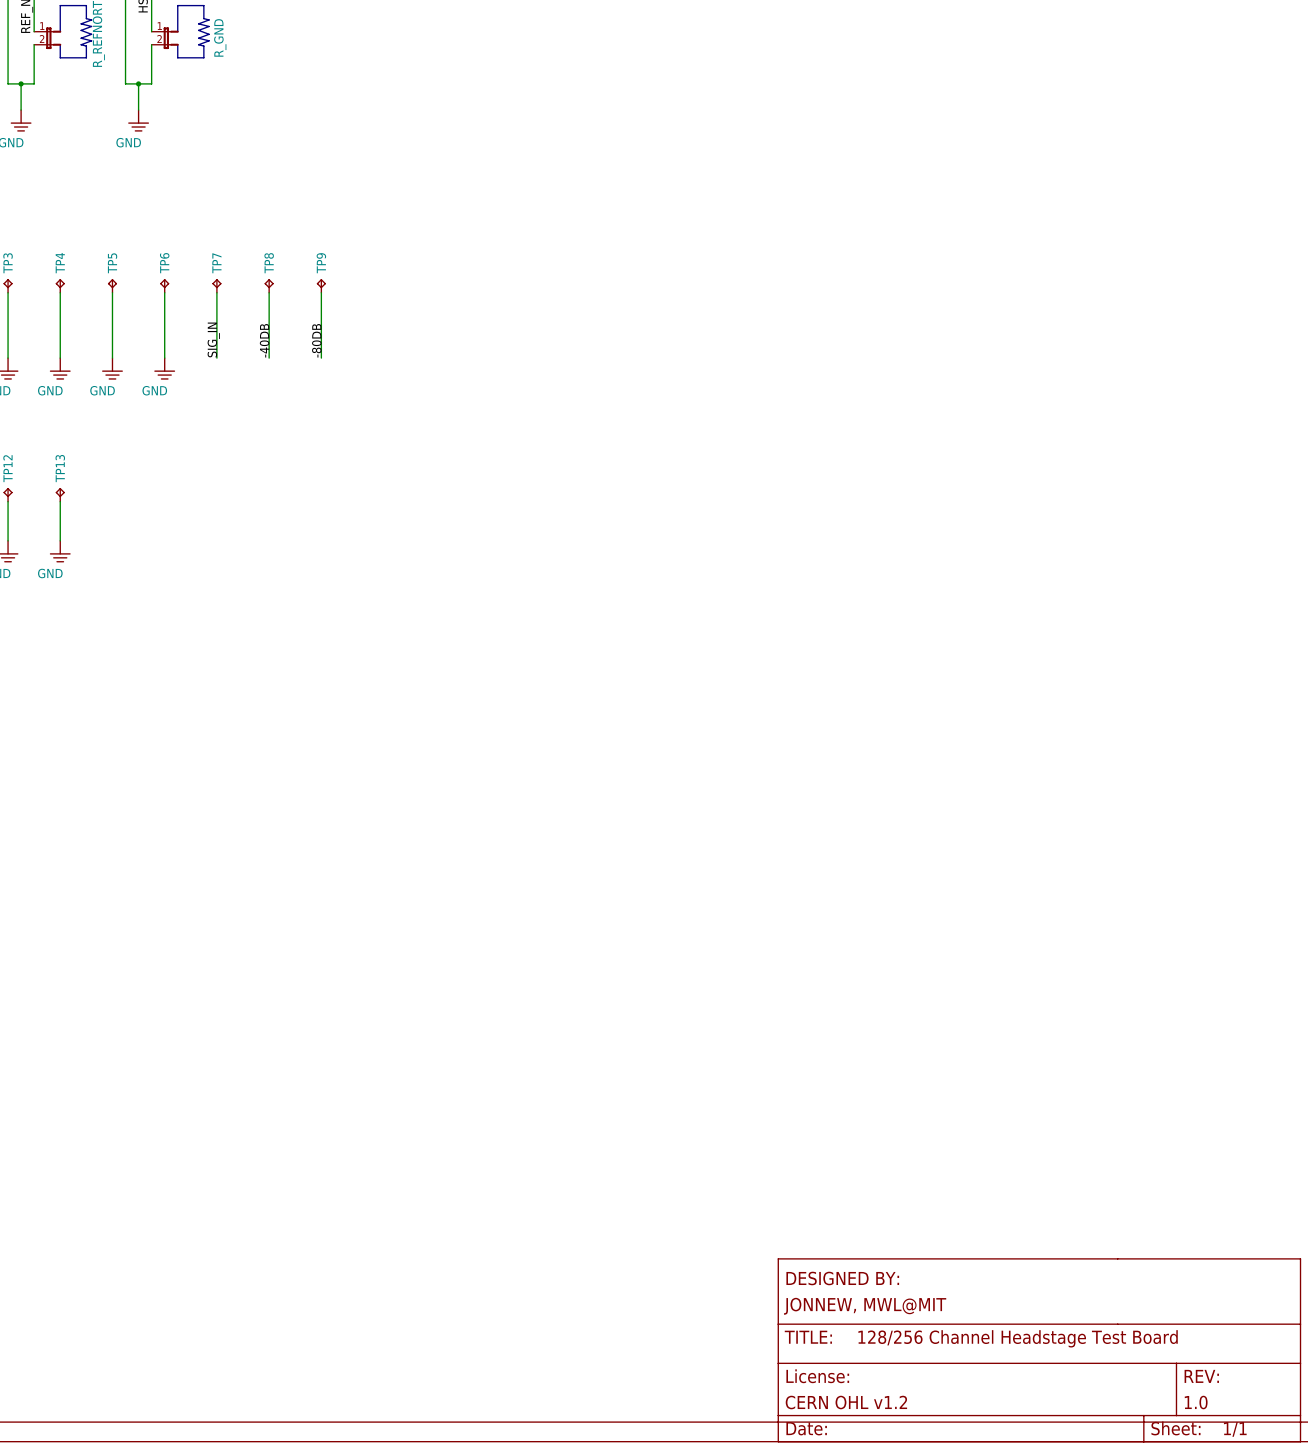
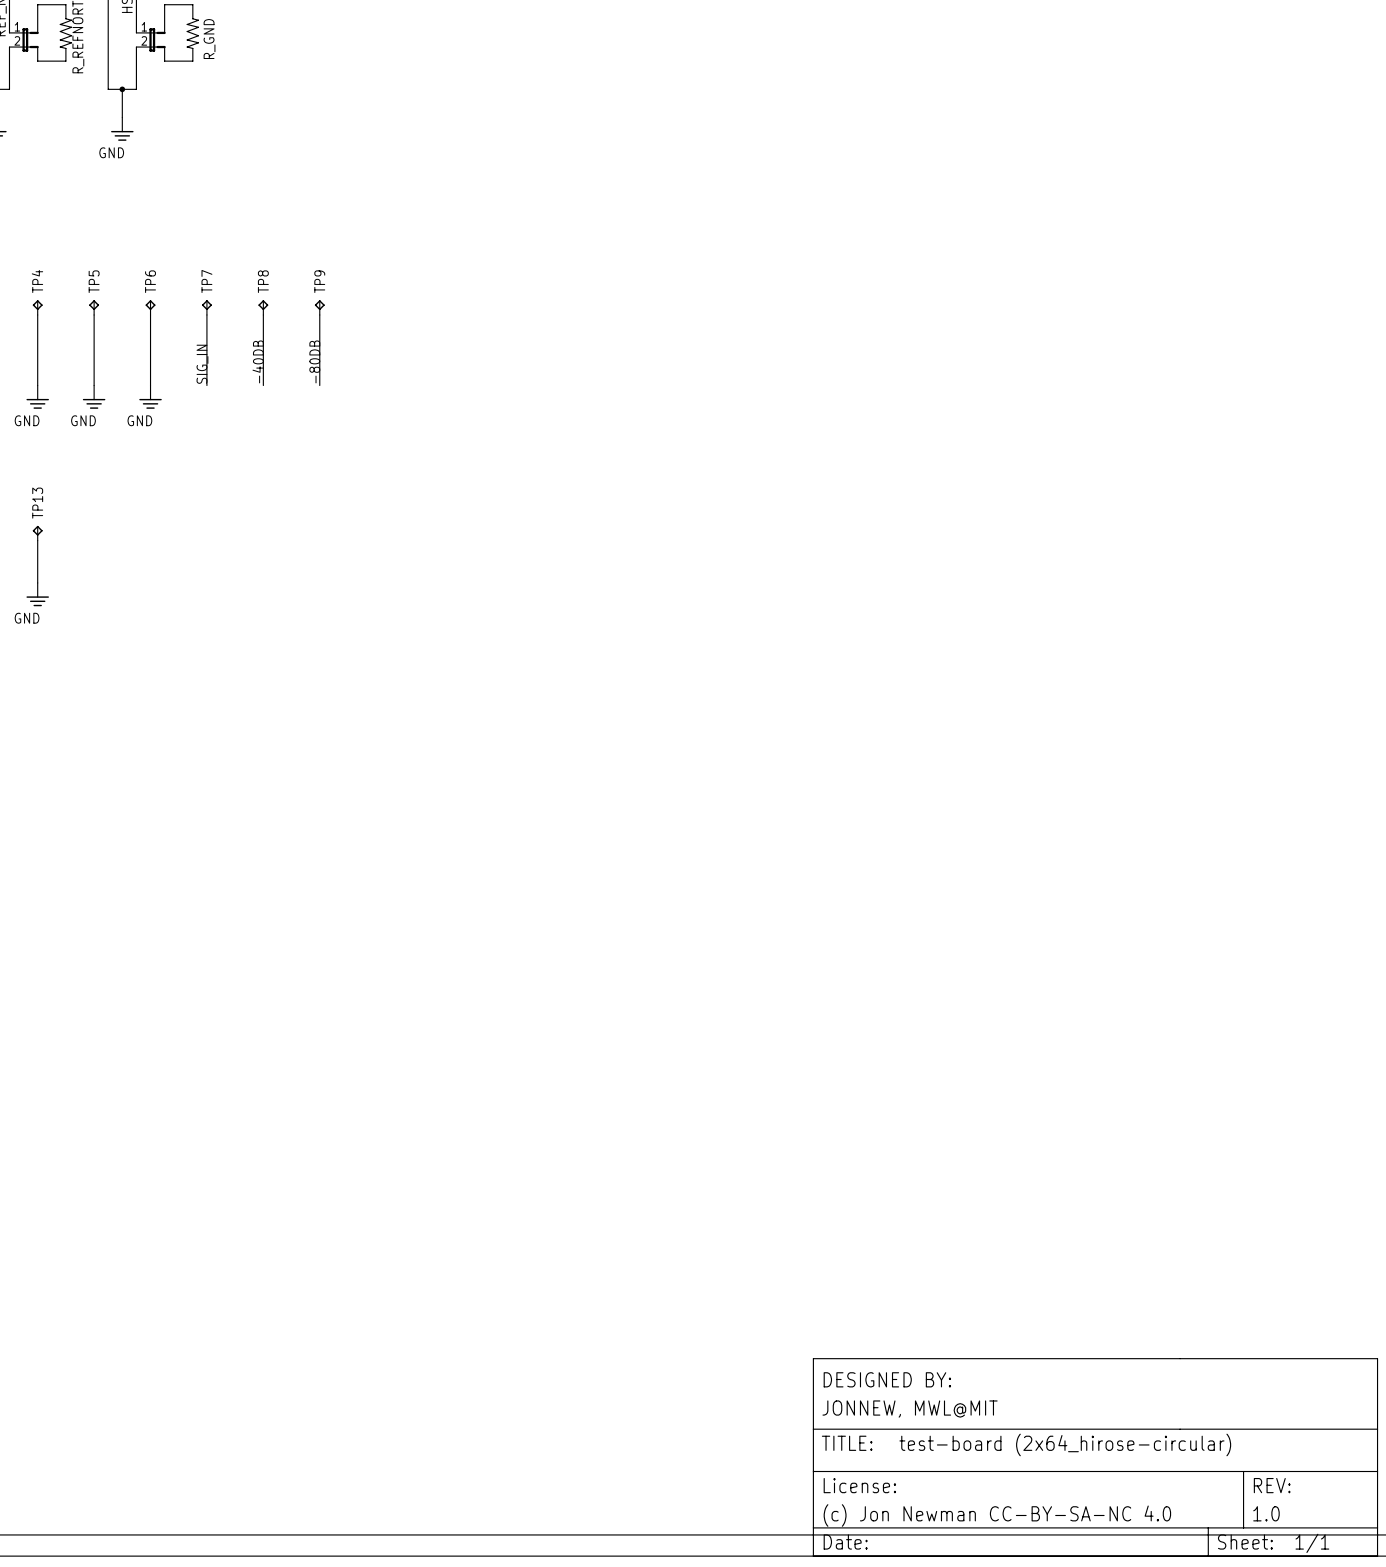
part text: 128/256 Channel Headstage Test Board (1018, 1338) -> test-board (2x64_hirose-circular) (1065, 1444)
part text: CERN OHL v1.2 (846, 1402) -> (c) Jon Newman CC-BY-SA-NC 4.0 (997, 1515)

